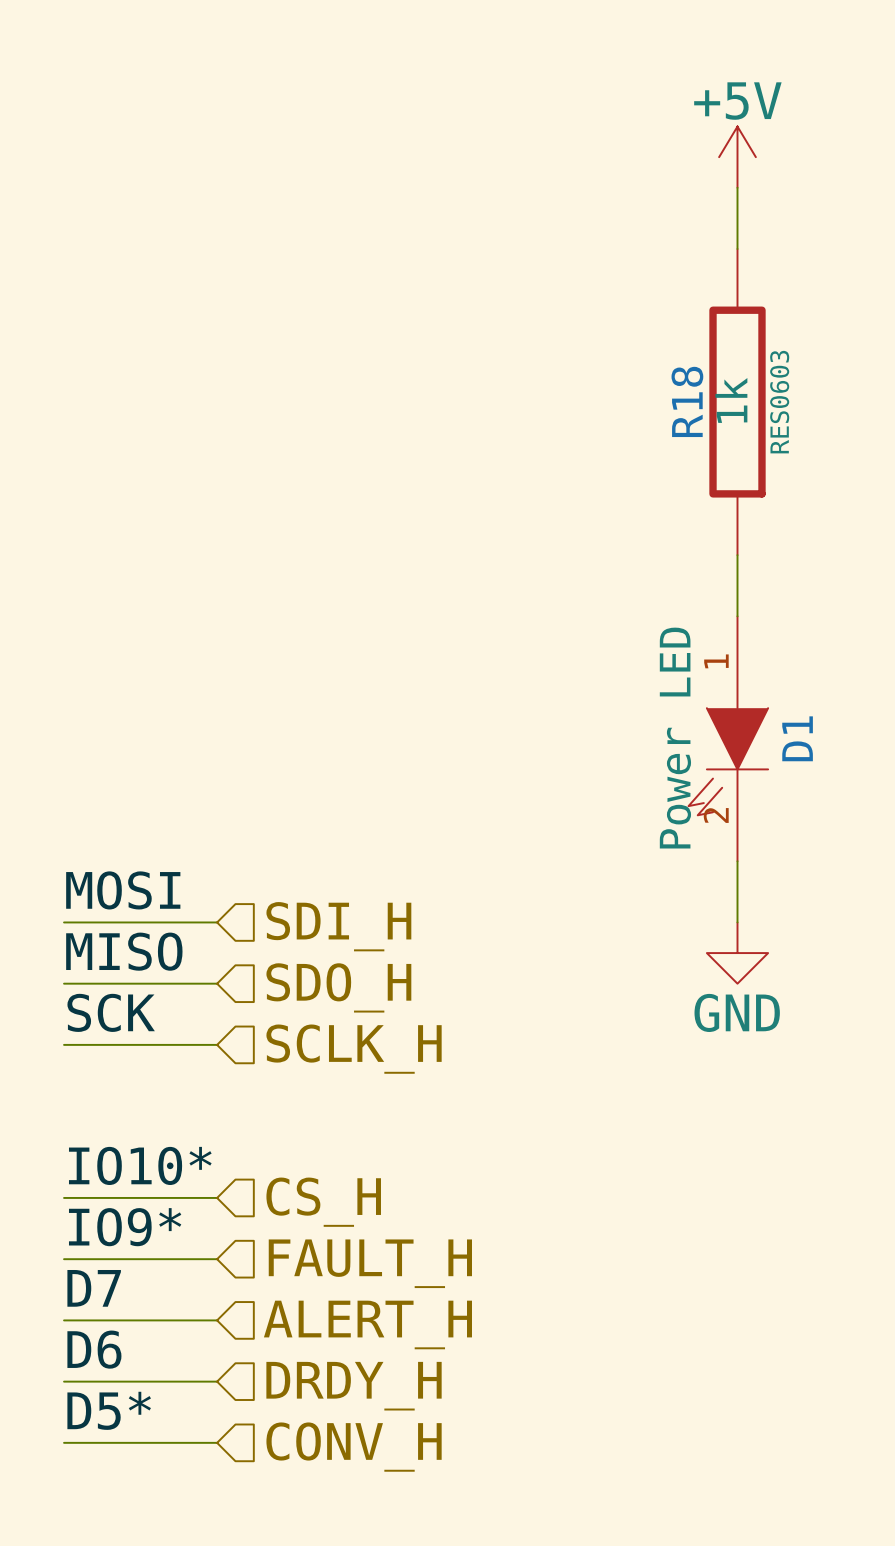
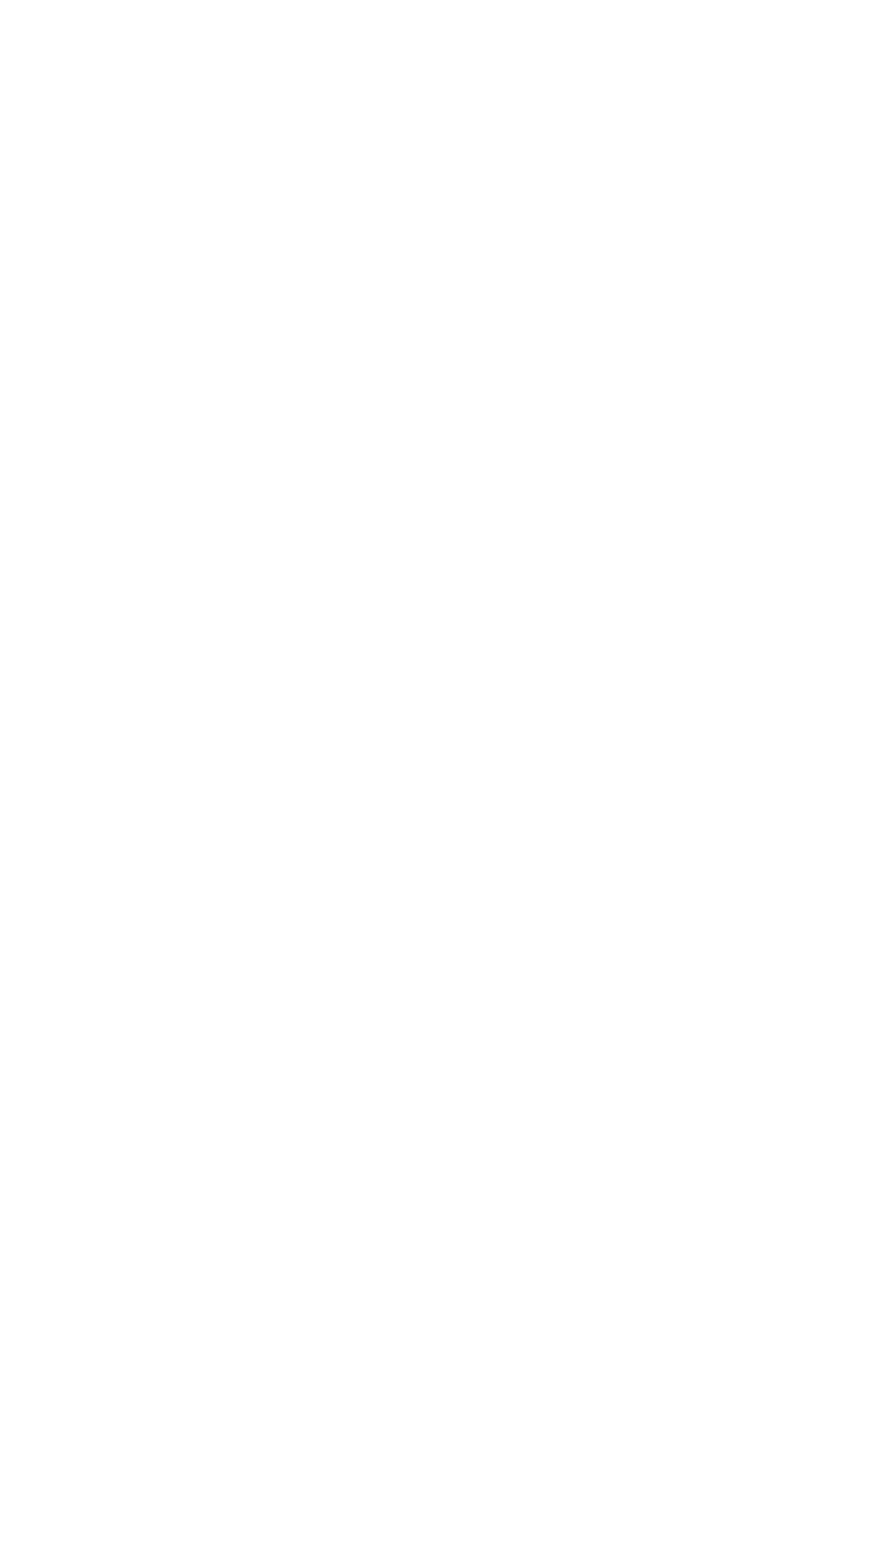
power symbol: +5V (737, 157) -> none
wire: (737, 187) (737, 248) -> none
R18: 1k (737, 402) -> none
wire: (737, 555) (737, 616) -> none
D1: Power LED (728, 738) -> none
wire: (737, 861) (737, 922) -> none
label: MOSI (123, 890) -> none
wire: (64, 922) (217, 922) -> none
hierarchical label: SDI_H (338, 926) -> none
label: MISO (124, 951) -> none
power symbol: GND (737, 953) -> none
wire: (64, 983) (217, 983) -> none
hierarchical label: SDO_H (338, 987) -> none
label: SCK (111, 1012) -> none
wire: (64, 1044) (217, 1044) -> none
hierarchical label: SCLK_H (354, 1049) -> none
label: IO10* (140, 1165) -> none
wire: (64, 1197) (217, 1197) -> none
hierarchical label: CS_H (323, 1202) -> none
label: IO9* (125, 1227) -> none
wire: (64, 1259) (217, 1259) -> none
hierarchical label: FAULT_H (370, 1263) -> none
label: D7 (94, 1288) -> none
wire: (64, 1320) (217, 1320) -> none
hierarchical label: ALERT_H (367, 1324) -> none
label: D6 (94, 1349) -> none
wire: (64, 1381) (217, 1381) -> none
hierarchical label: DRDY_H (354, 1386) -> none
label: D5* (109, 1410) -> none
wire: (64, 1442) (217, 1442) -> none
hierarchical label: CONV_H (354, 1447) -> none

